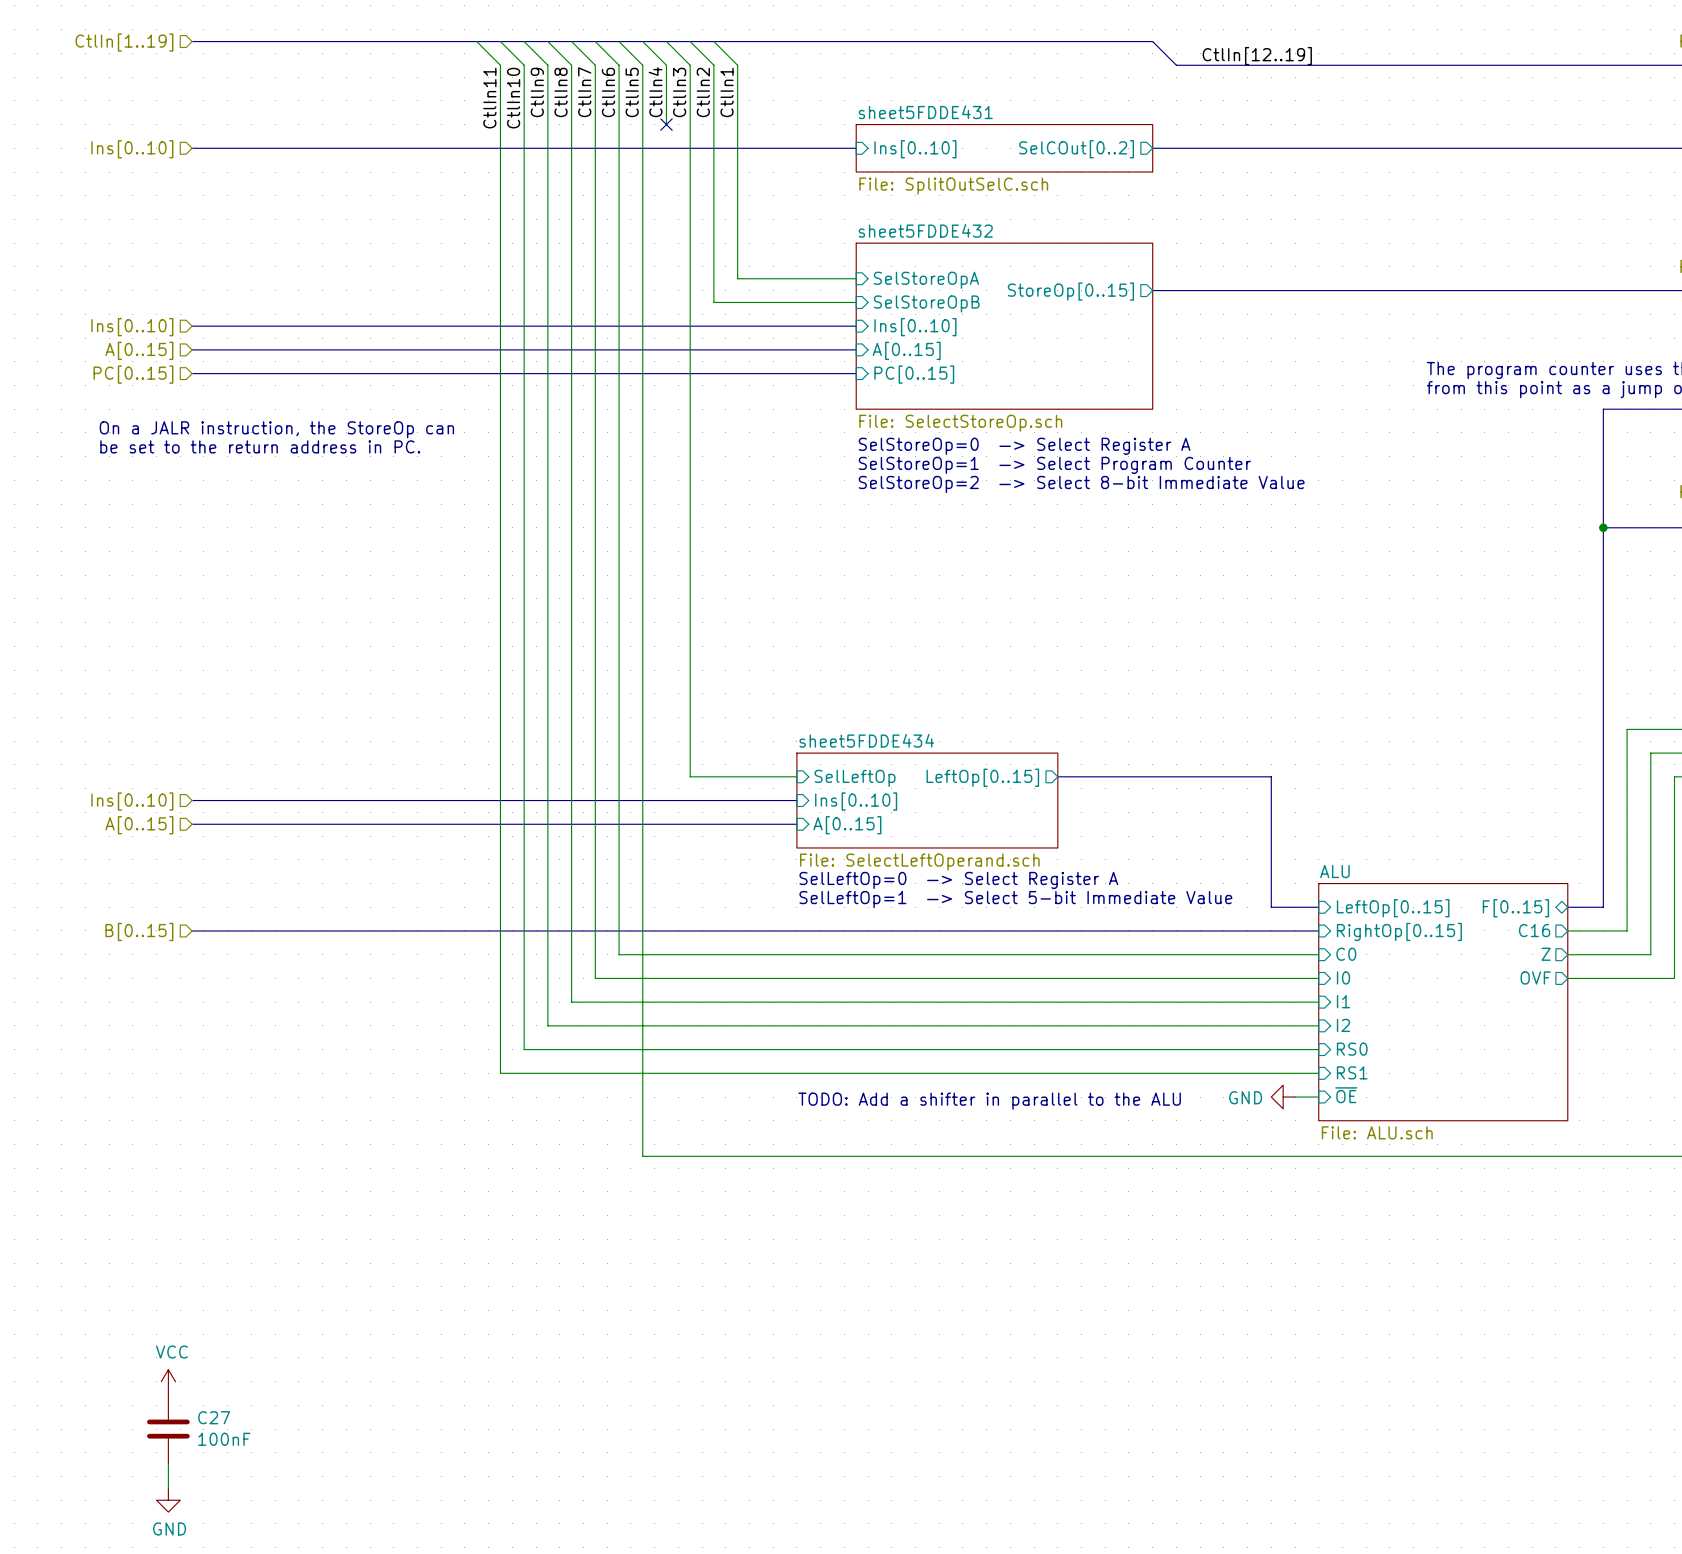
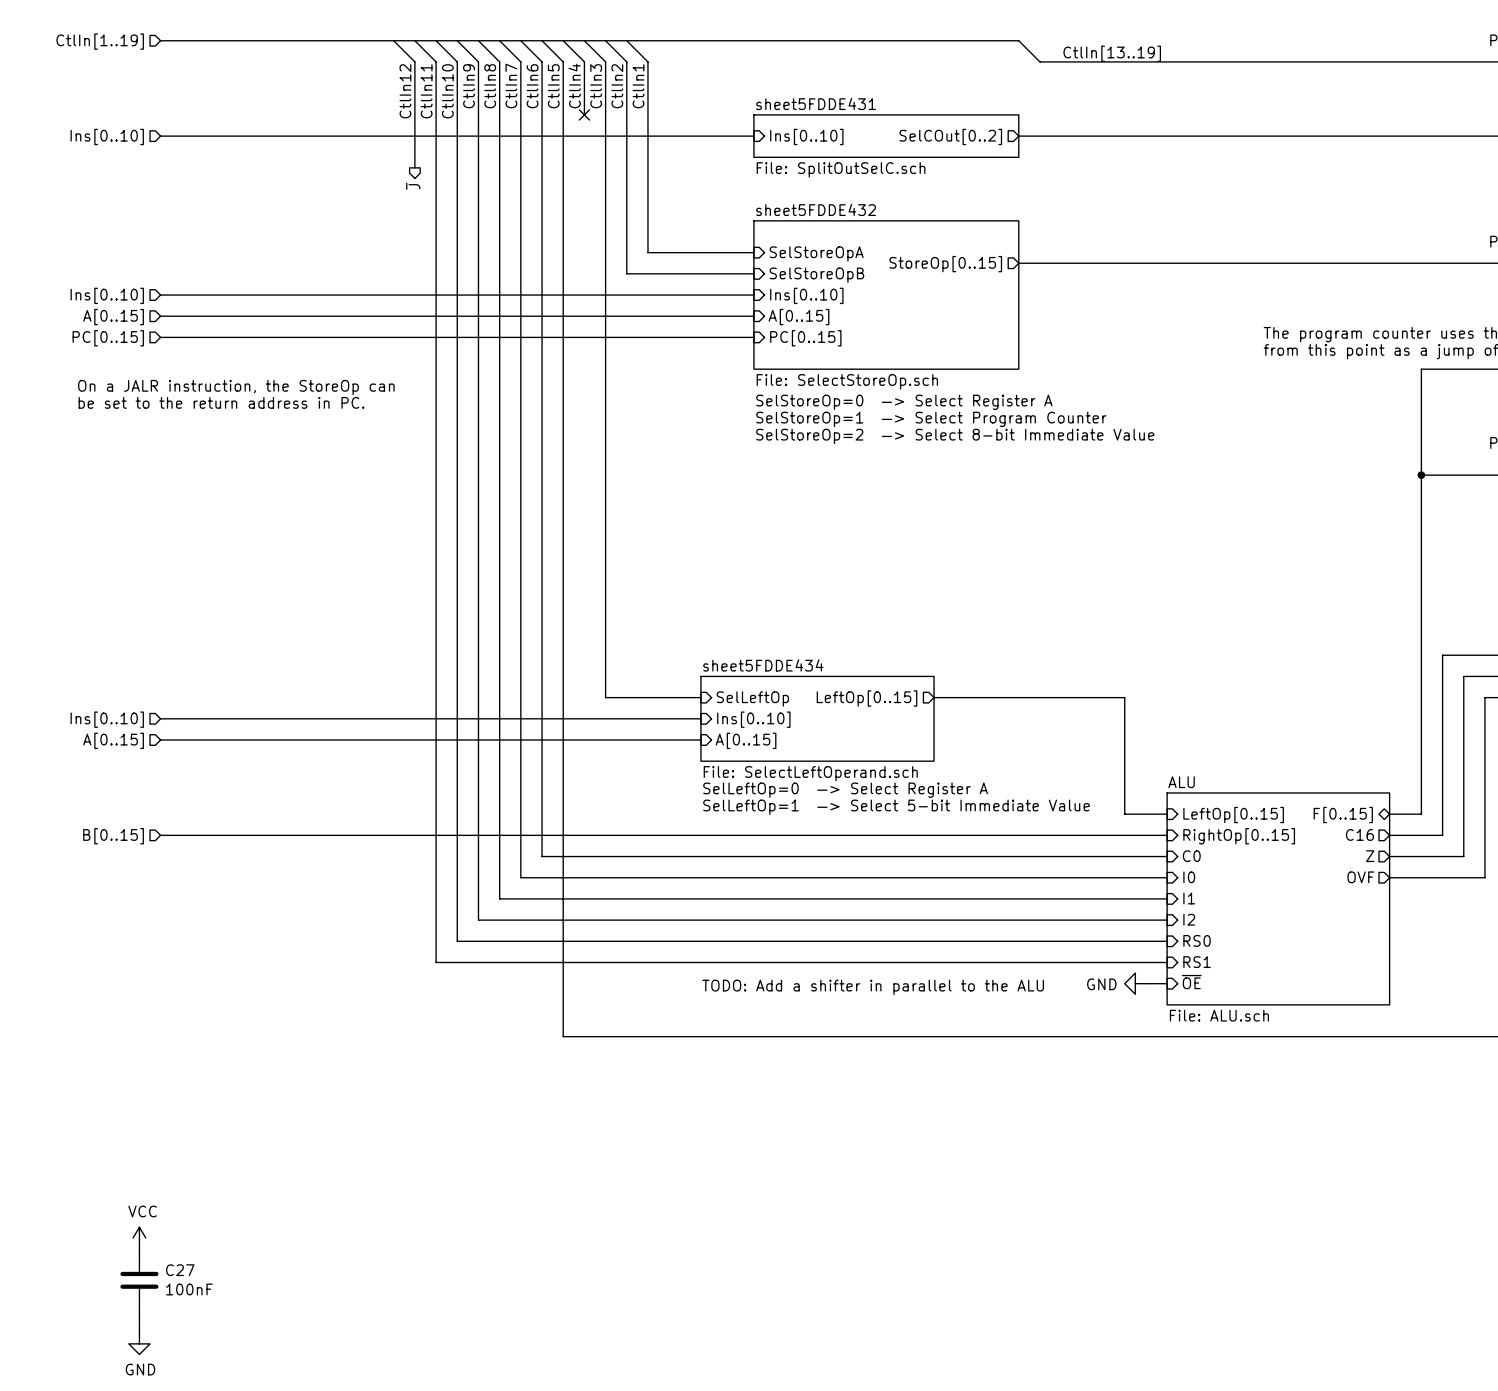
wire: none -> (393, 40) (414, 61) (414, 167)
label: CtlIn[12..19] (1257, 56) -> CtlIn[13..19] (1112, 53)
label: none -> CtlIn12 (405, 91)
hierarchical label: none -> ~{J} (413, 186)

